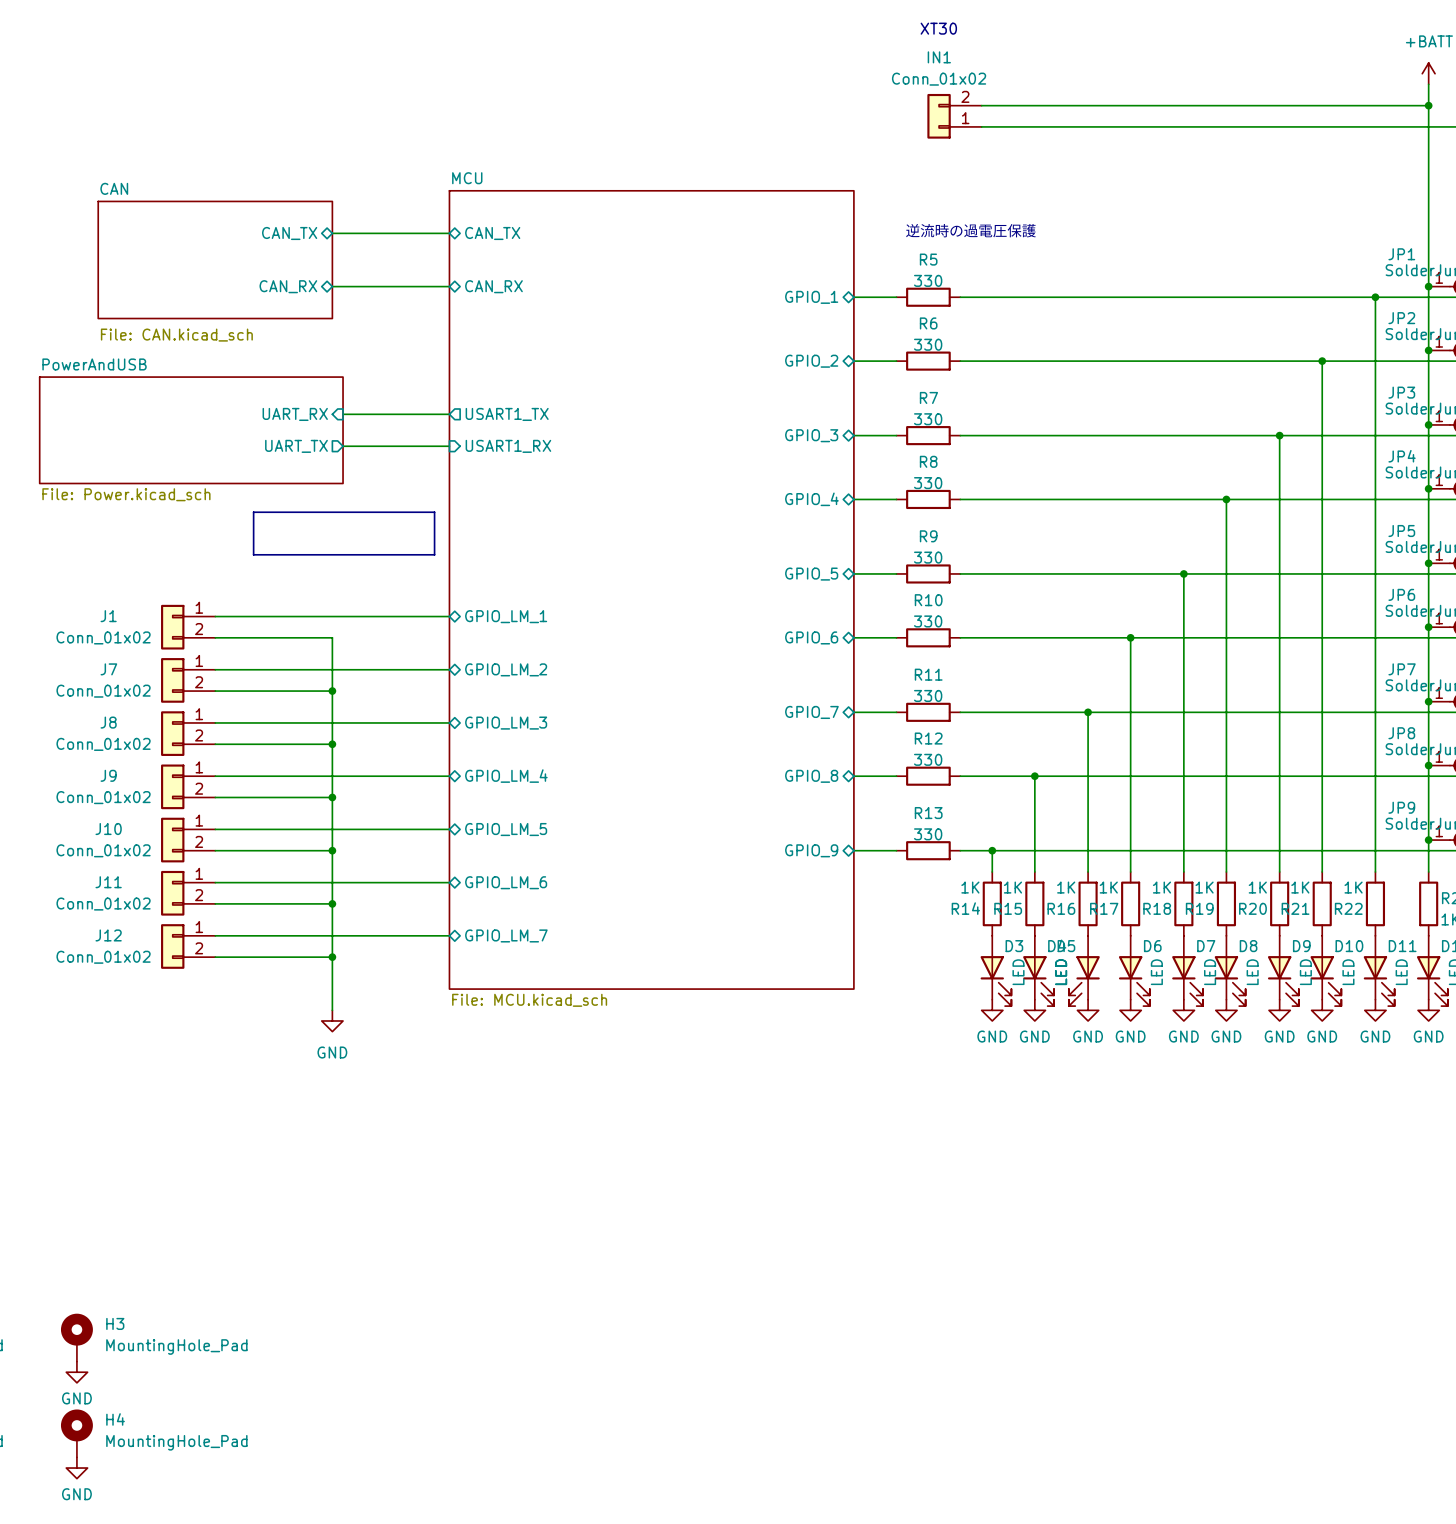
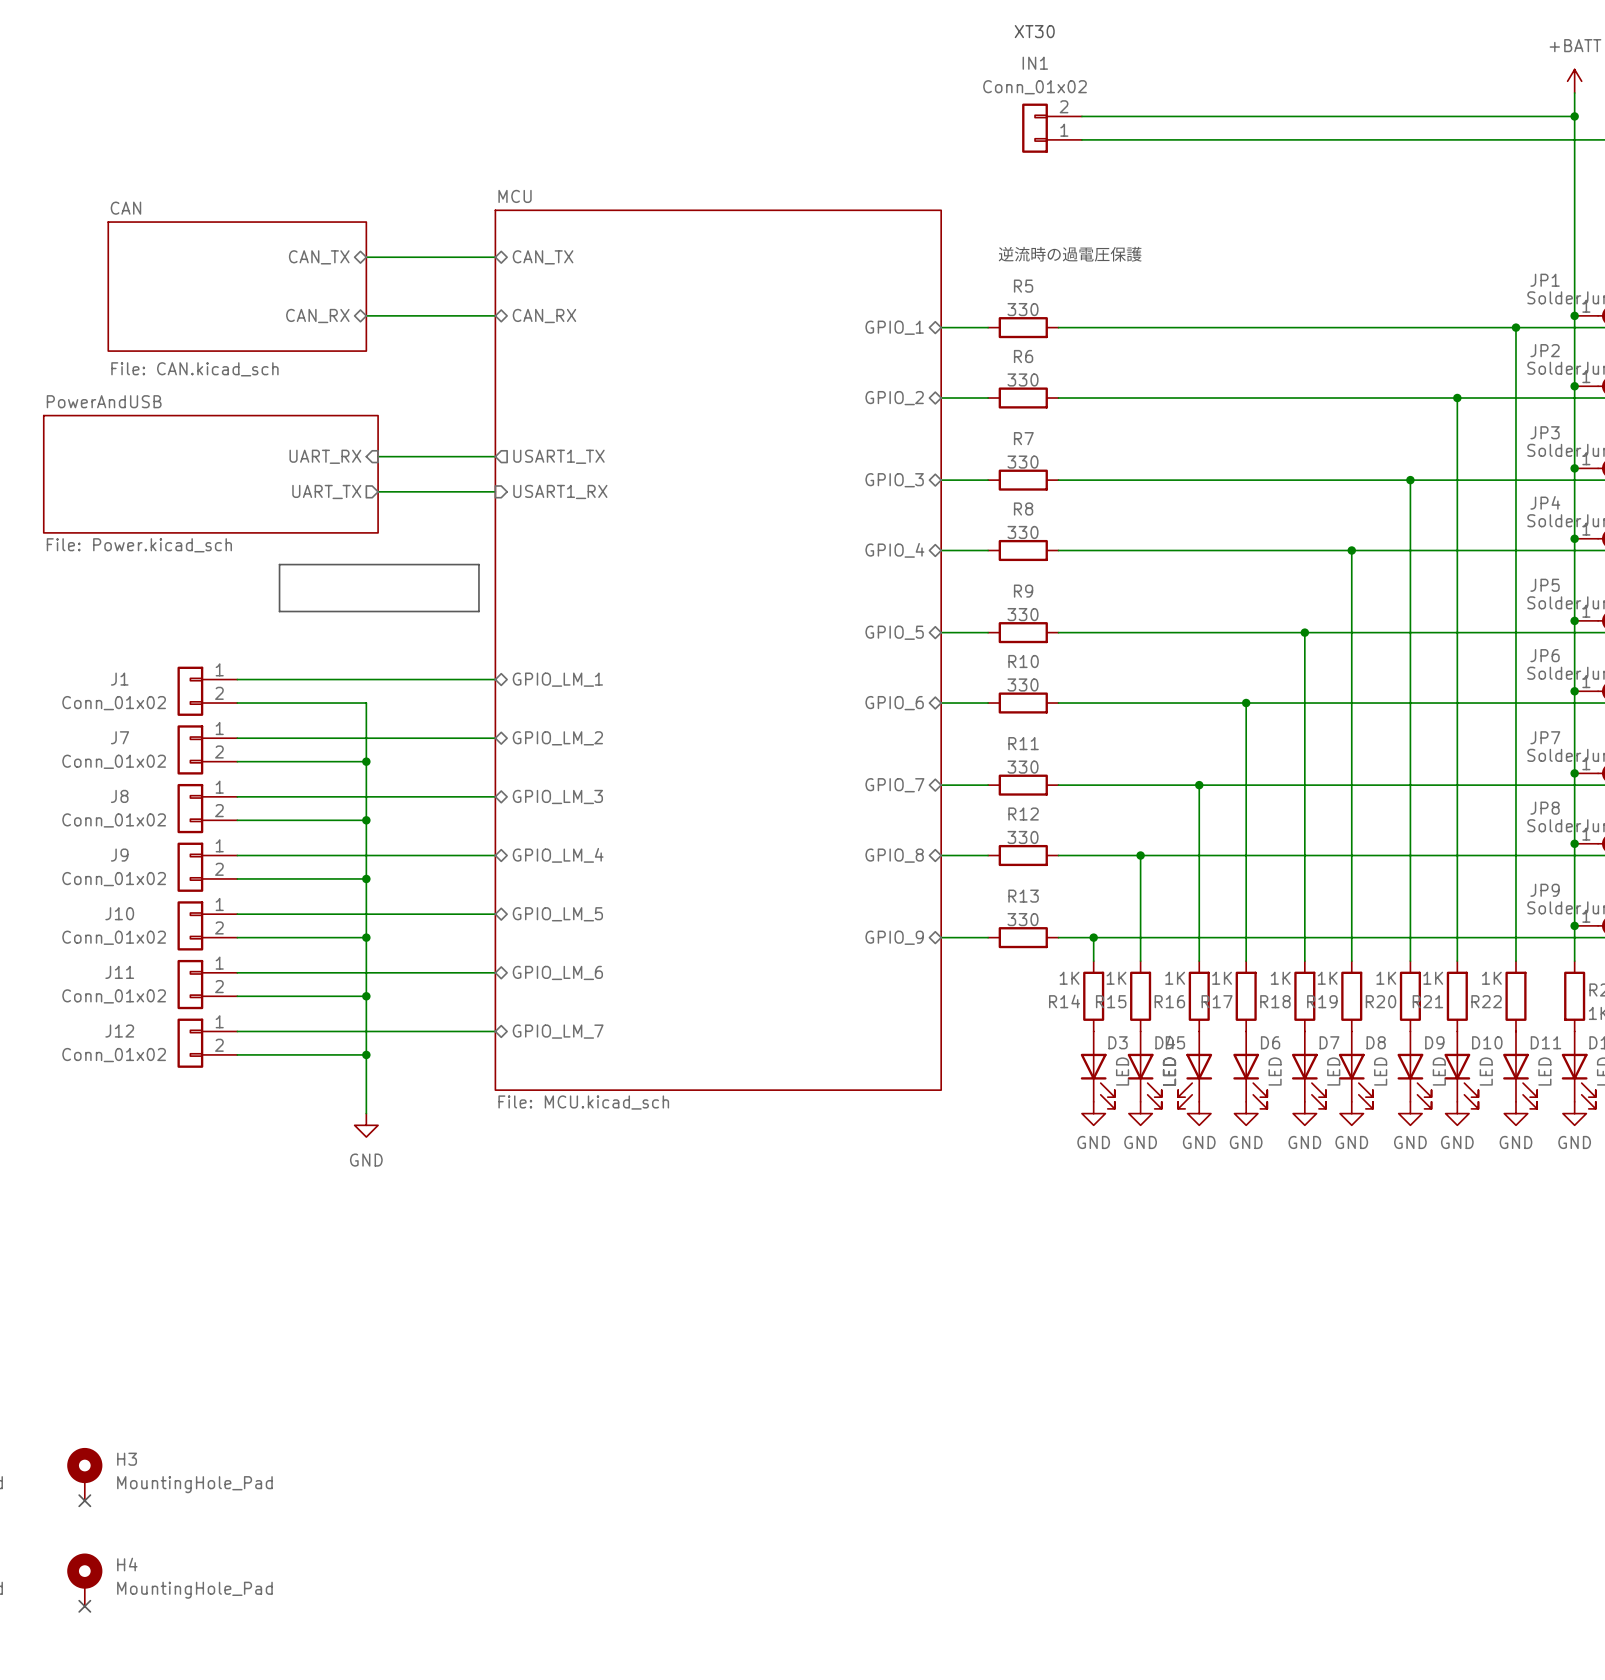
no-connect mark: none -> (84, 1500)
power symbol: GND (76, 1372) -> none
no-connect mark: none -> (84, 1606)
power symbol: GND (76, 1468) -> none

